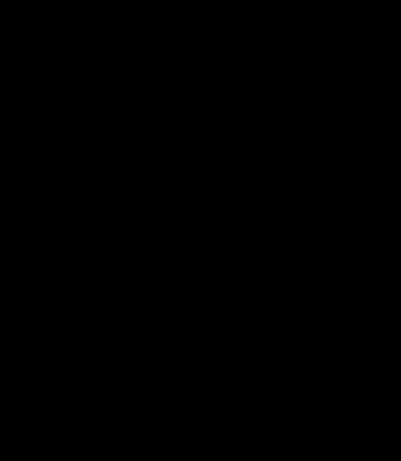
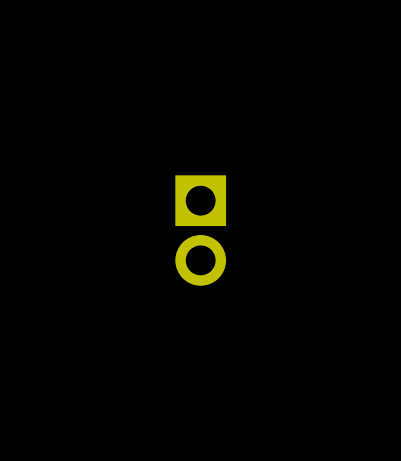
part: none -> (200, 230)

